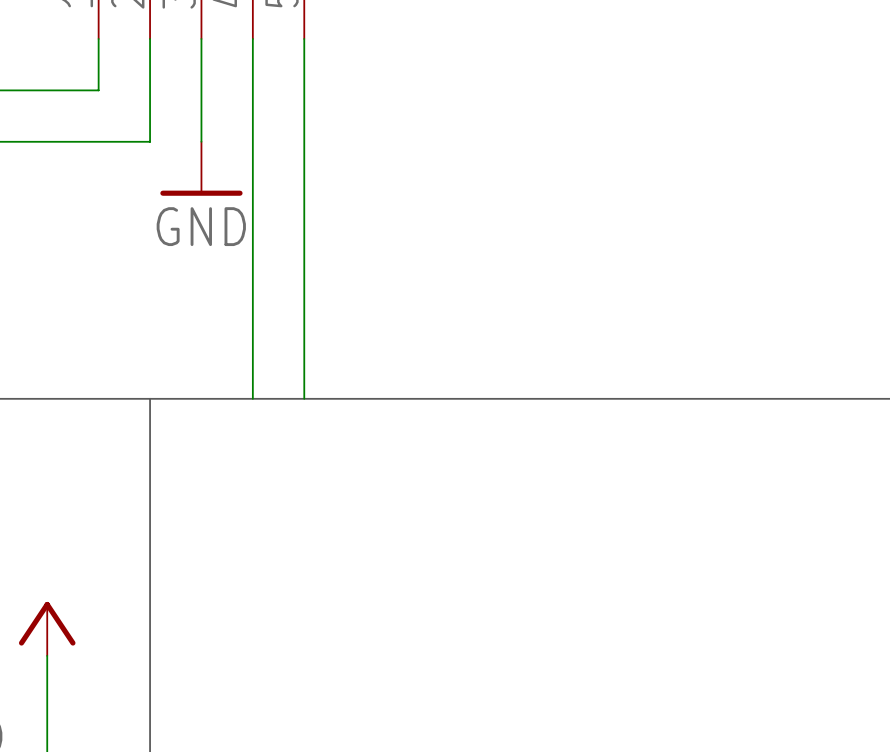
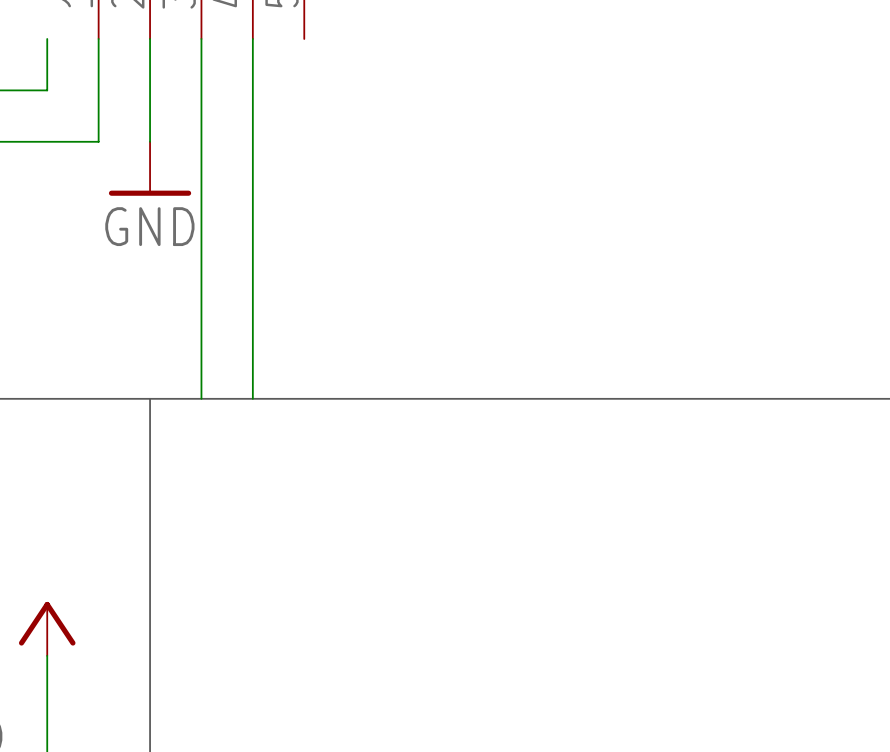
wire: (304, 38) (304, 398) -> none
wire: (47, 90) (98, 90) -> (47, 90) (47, 38)
wire: (98, 141) (150, 141) -> (98, 141) (98, 90)
wire: none -> (201, 141) (201, 398)
power symbol position: GND (201, 168) -> GND (150, 168)

